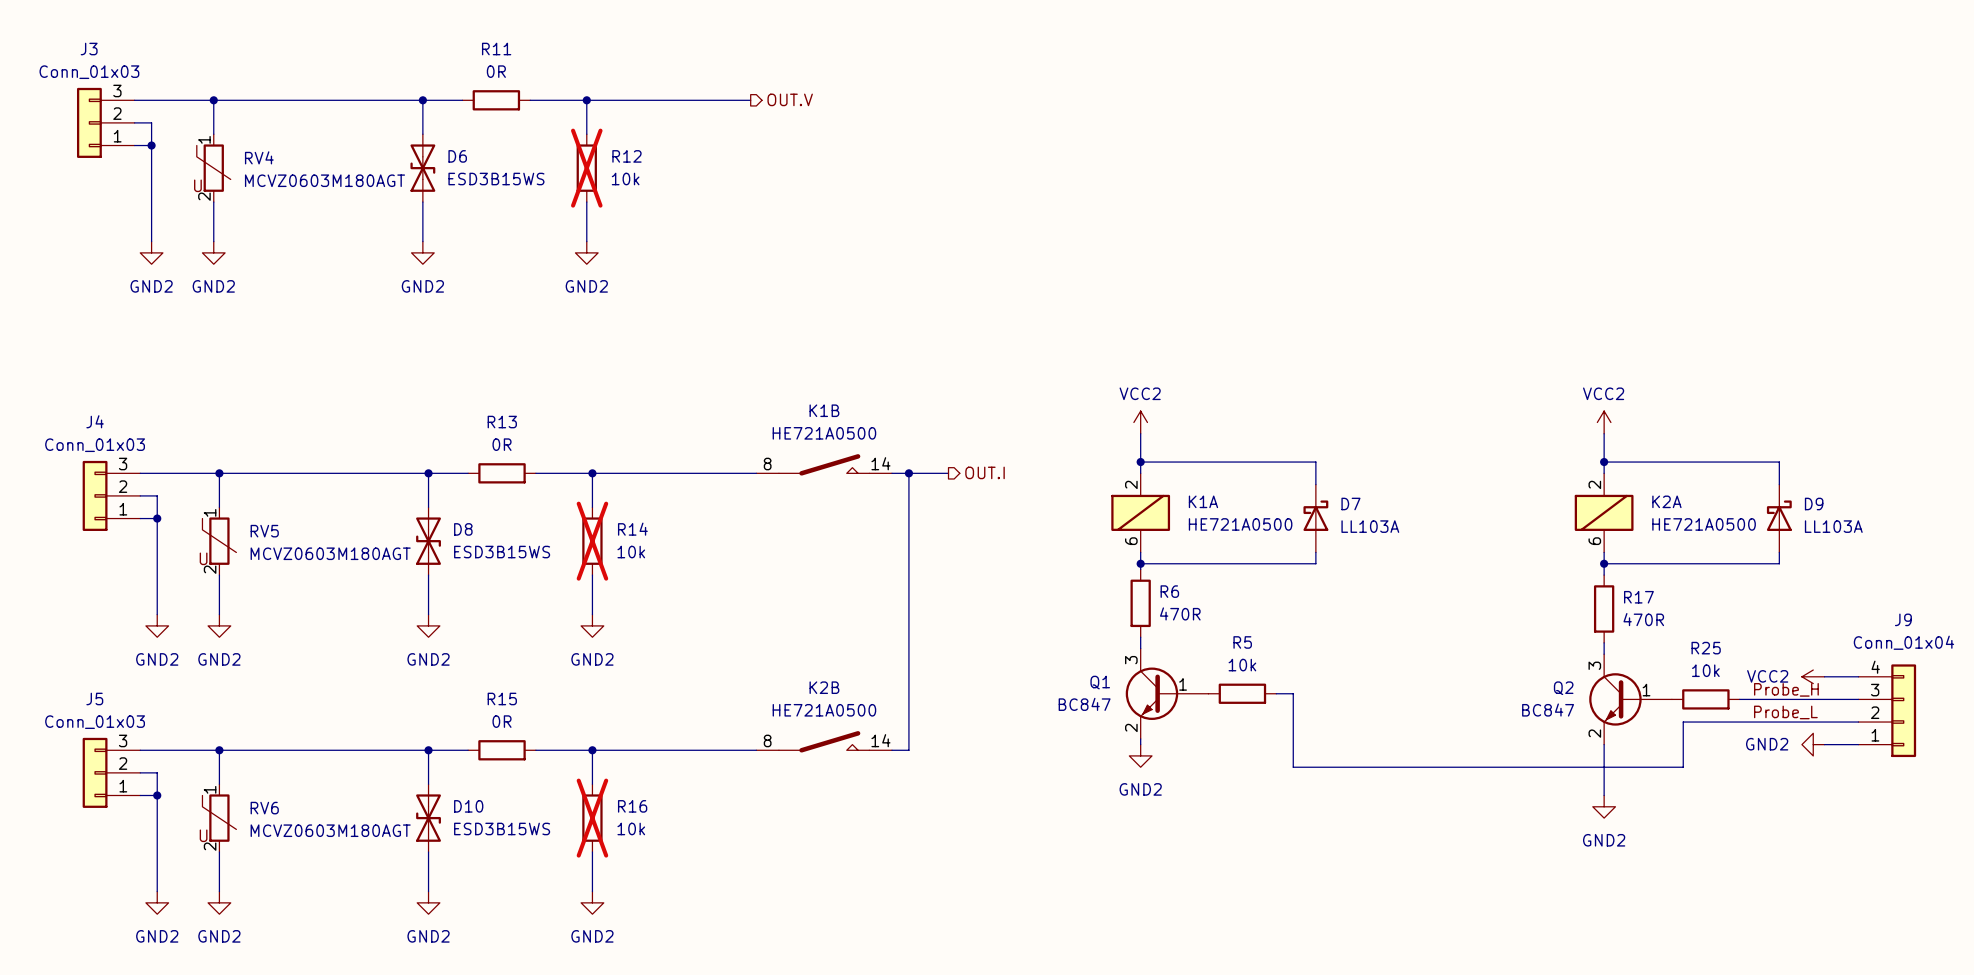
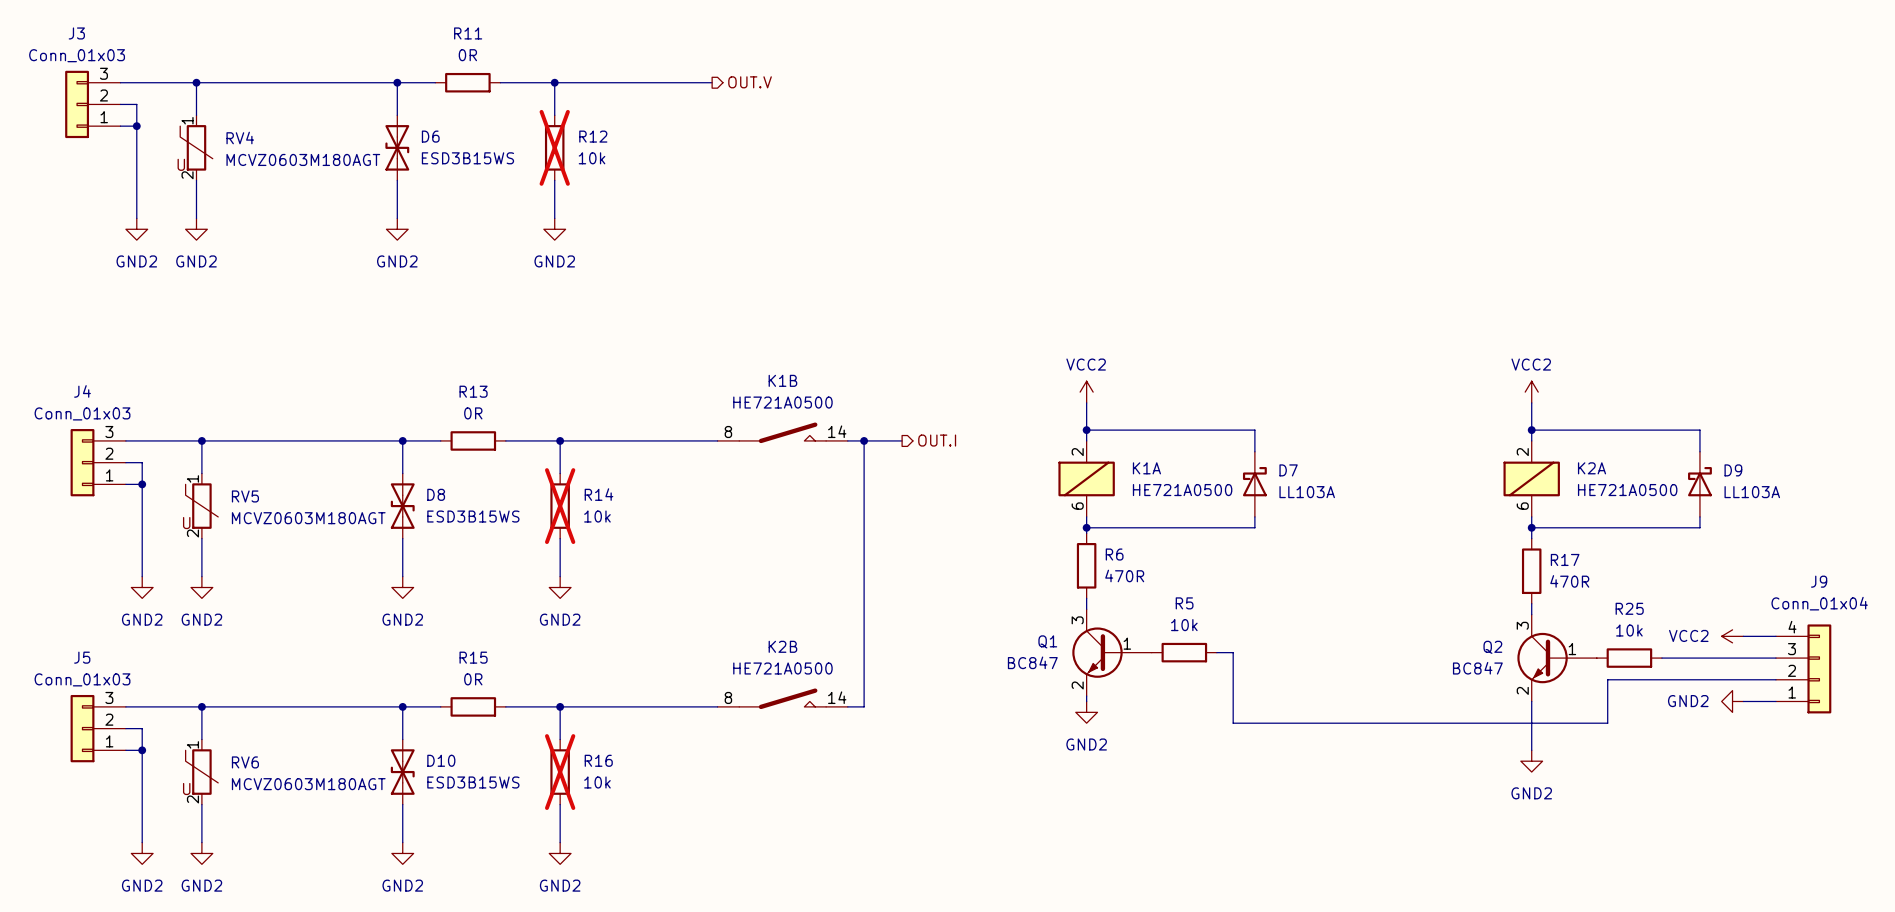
label: Probe_H (1786, 689) -> none
label: Probe_L (1785, 712) -> none

